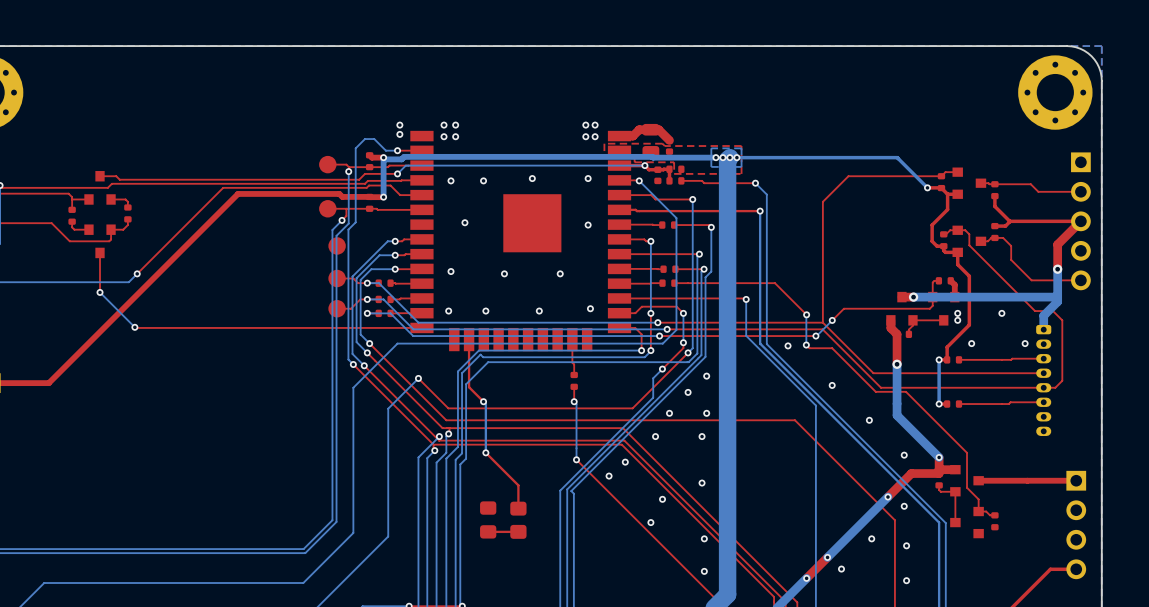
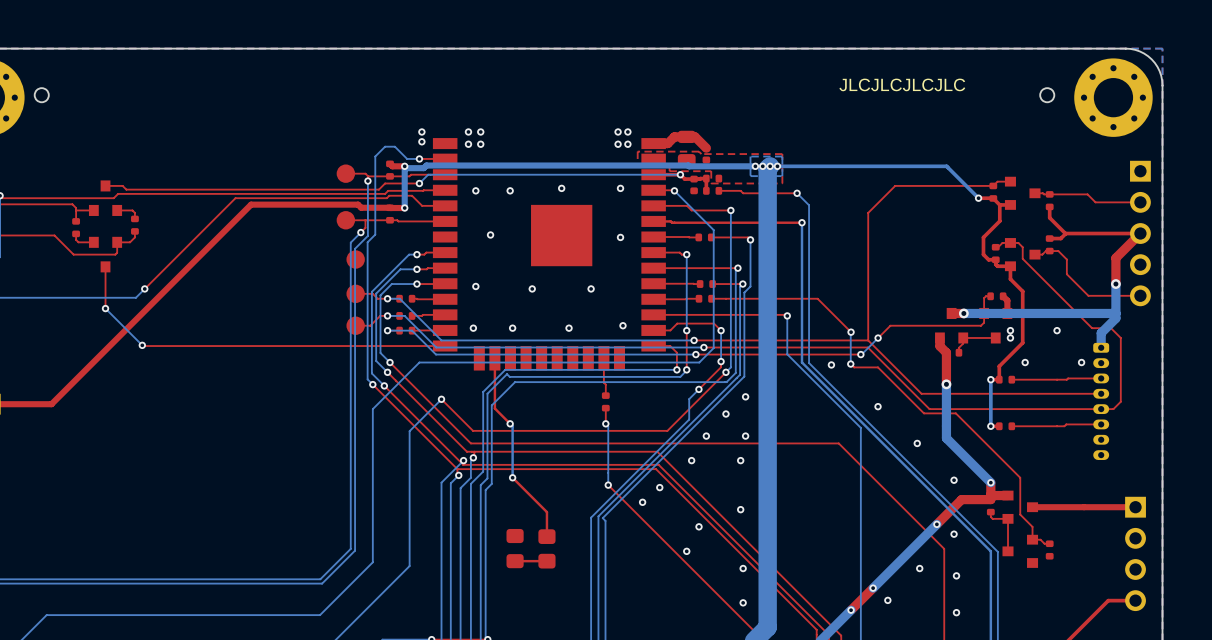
text: none -> JLCJLCJLCJLC (902, 84)
round board edge: none -> [33, 87, 50, 104]
round board edge: none -> [1039, 87, 1056, 104]

